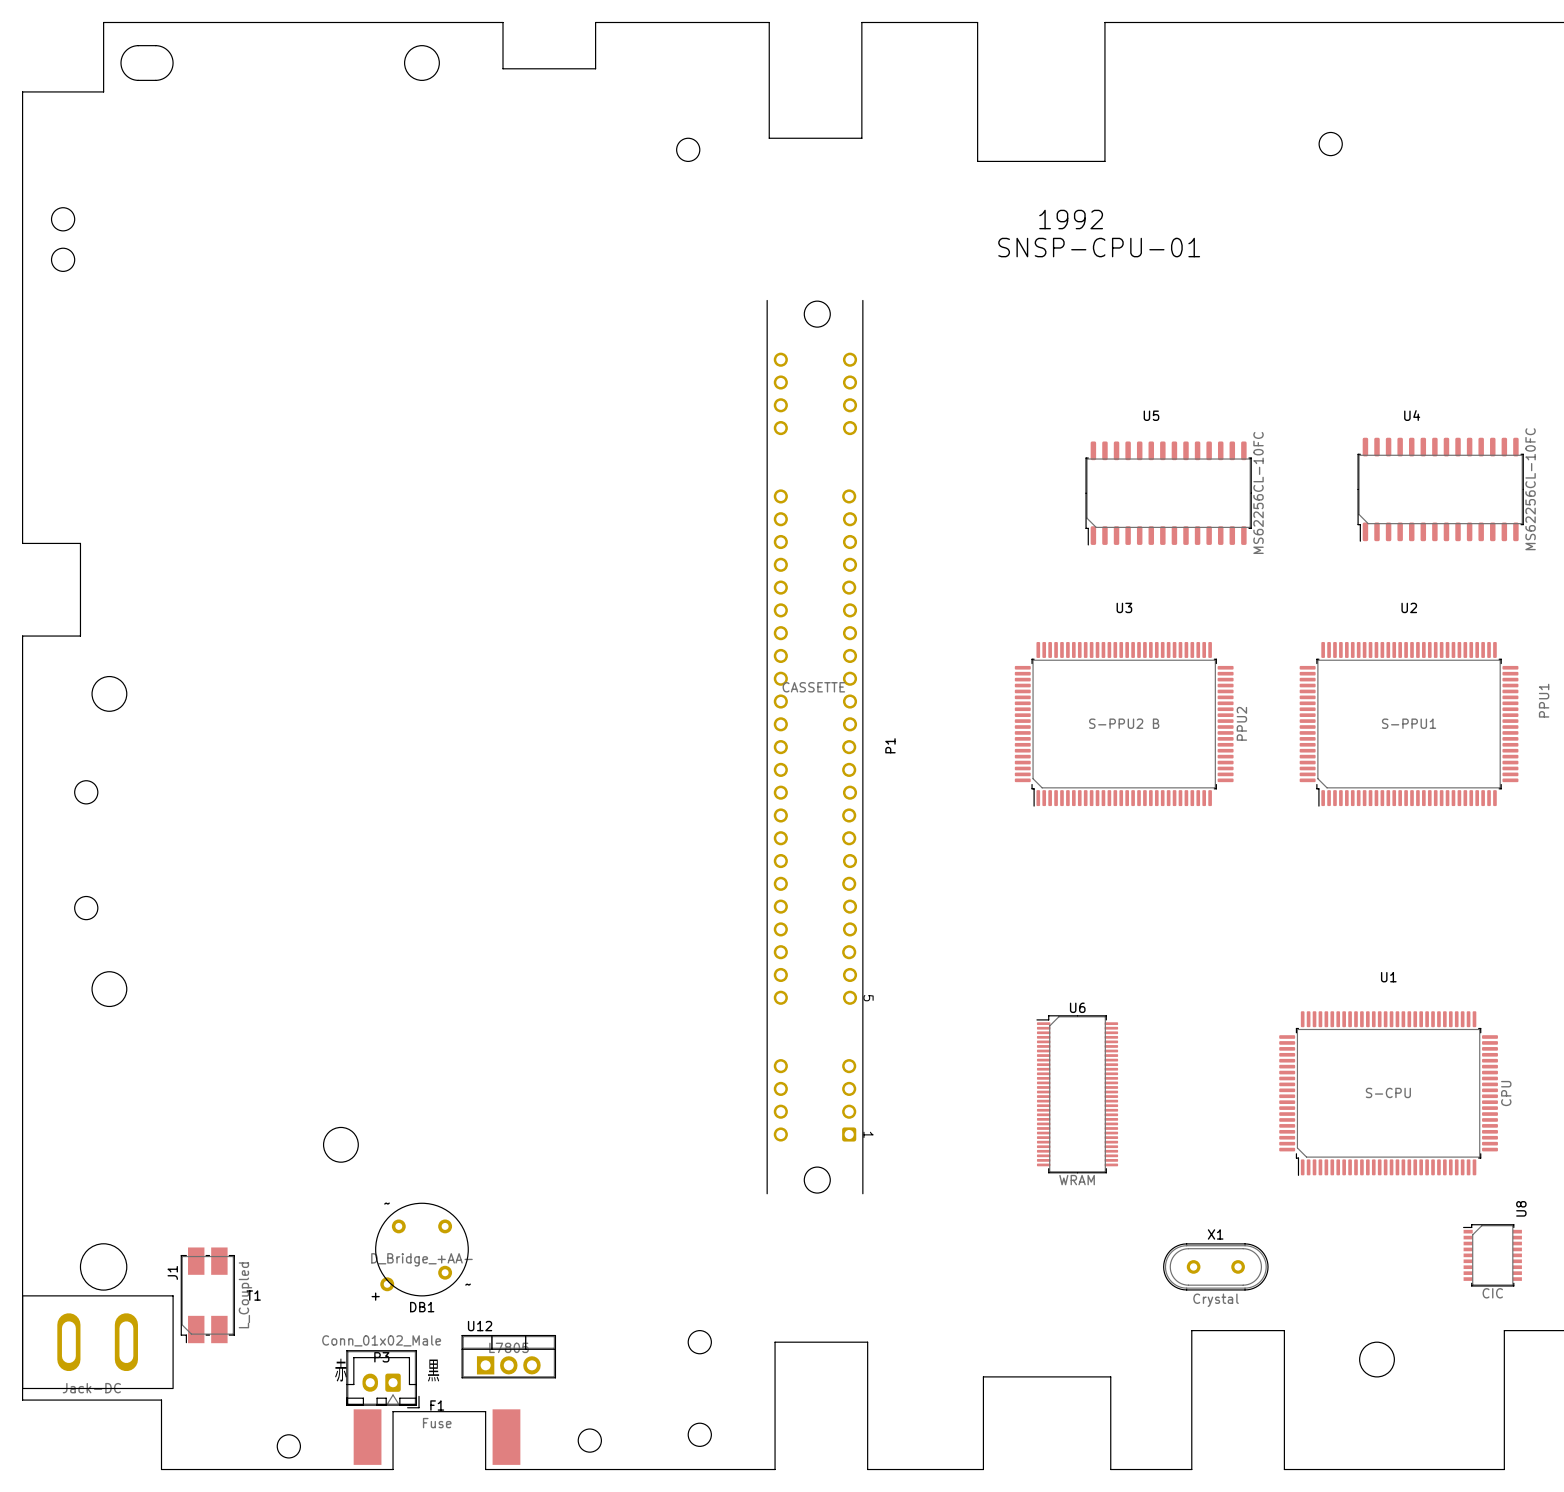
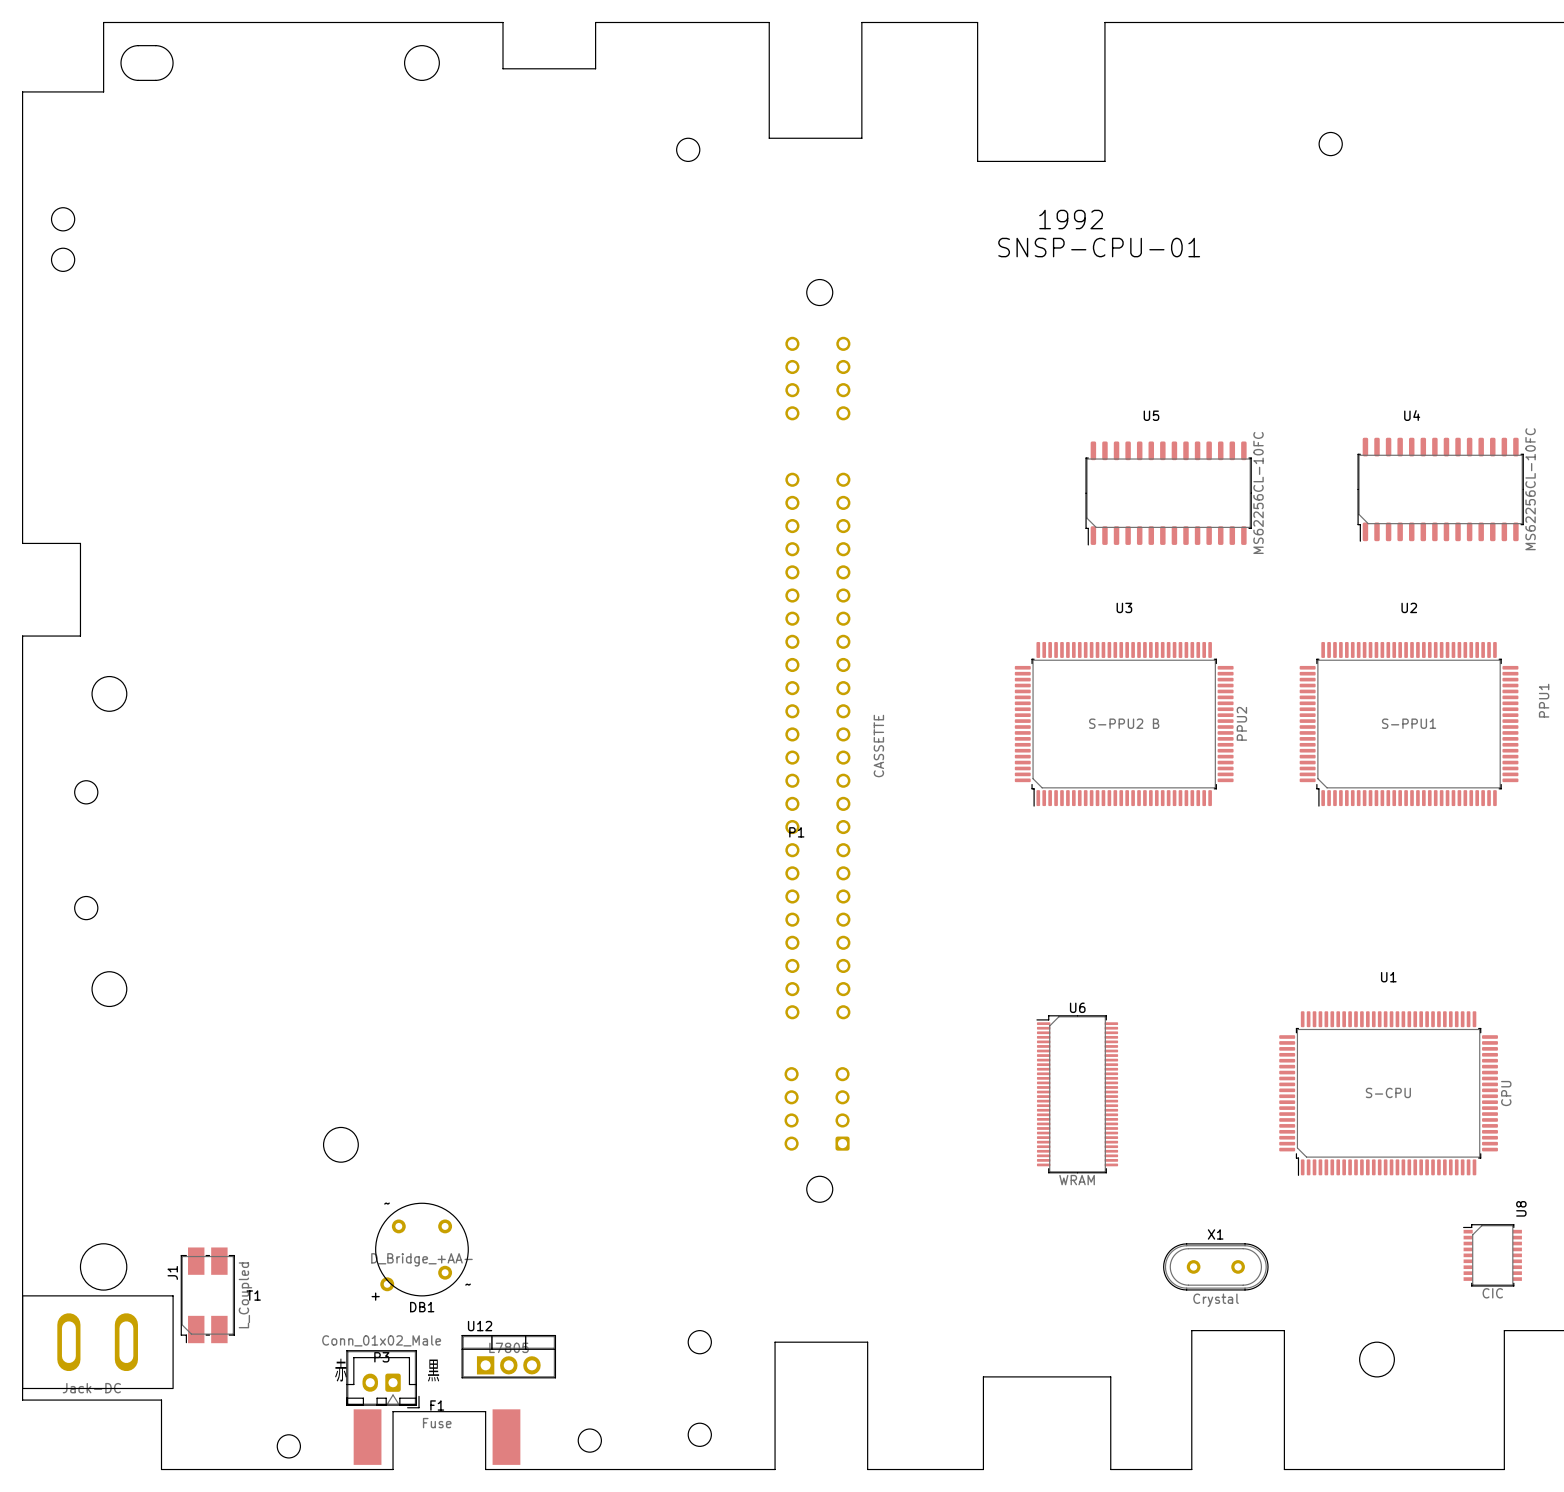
P1 footprint: [766, 300, 864, 1195] -> [784, 279, 851, 1203]
P1 value position: CASSETTE (813, 687) -> CASSETTE (878, 746)
P1 name position: P1 (890, 745) -> P1 (796, 832)

